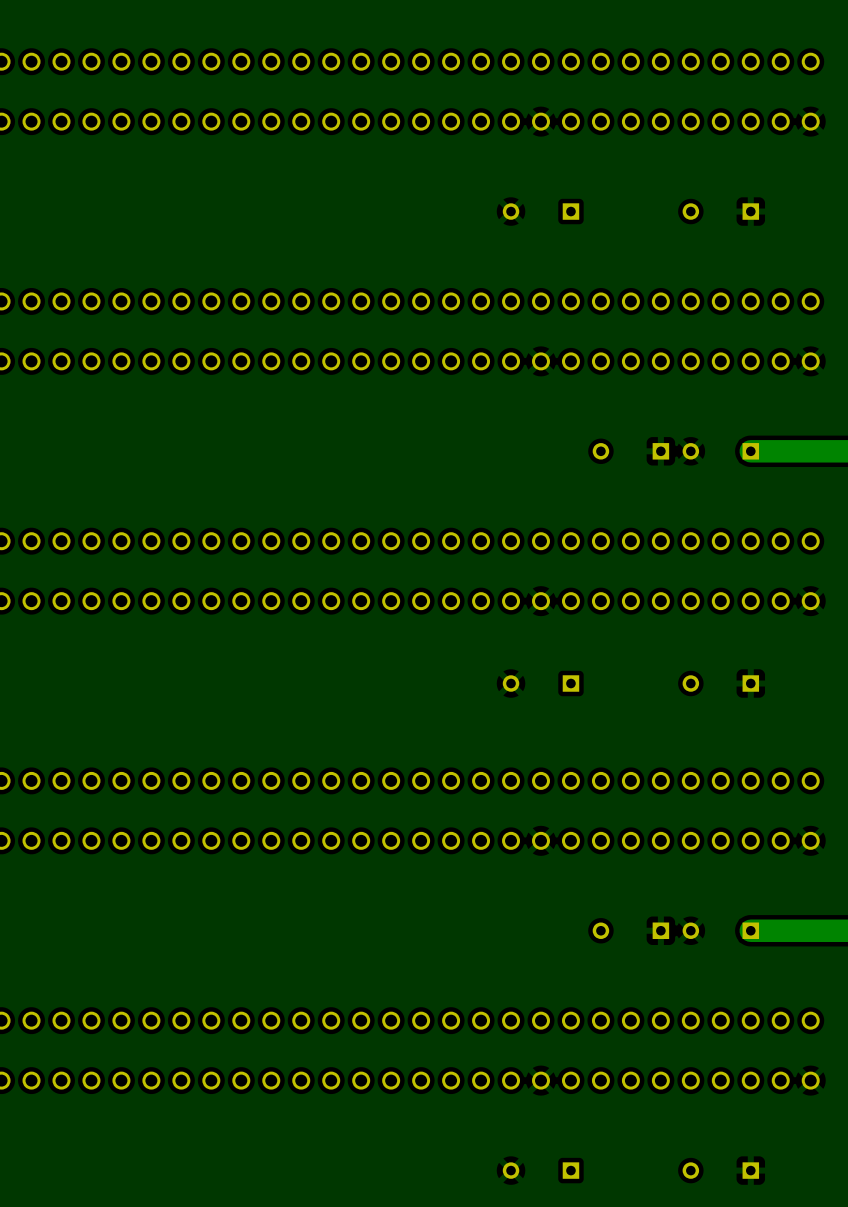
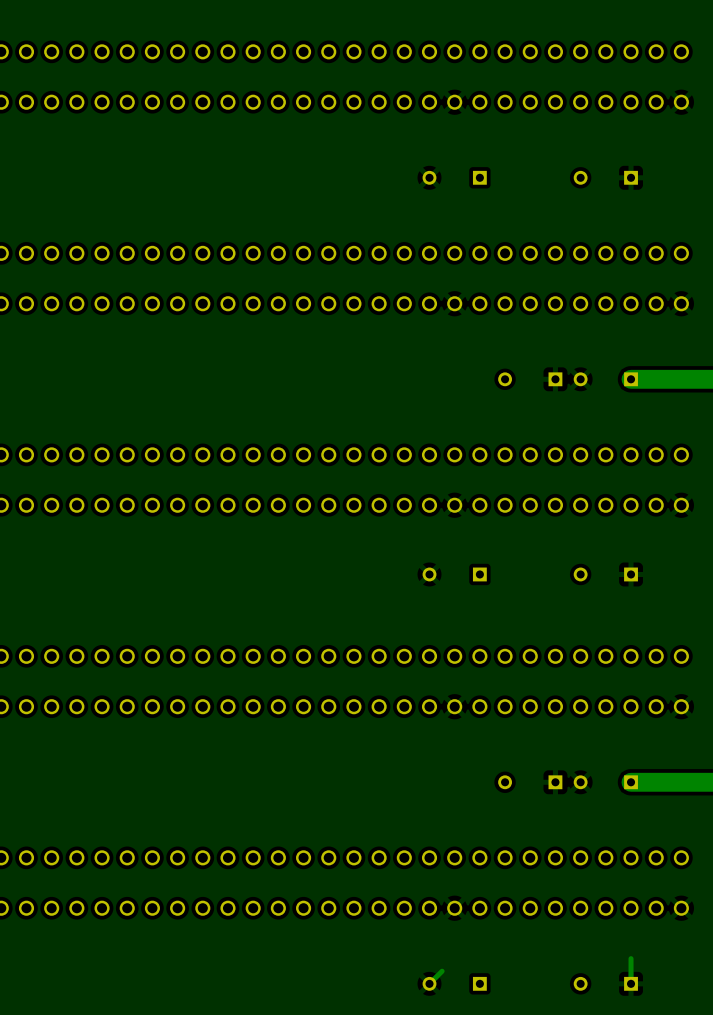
track: none -> (631, 958) (631, 983)
track: none -> (442, 971) (429, 983)

